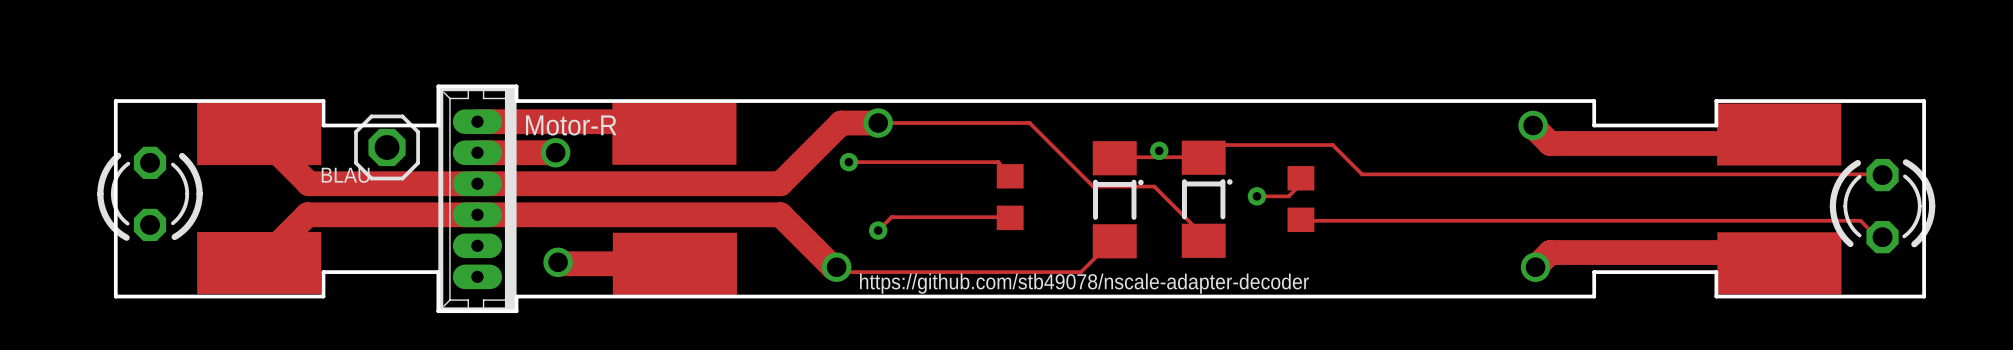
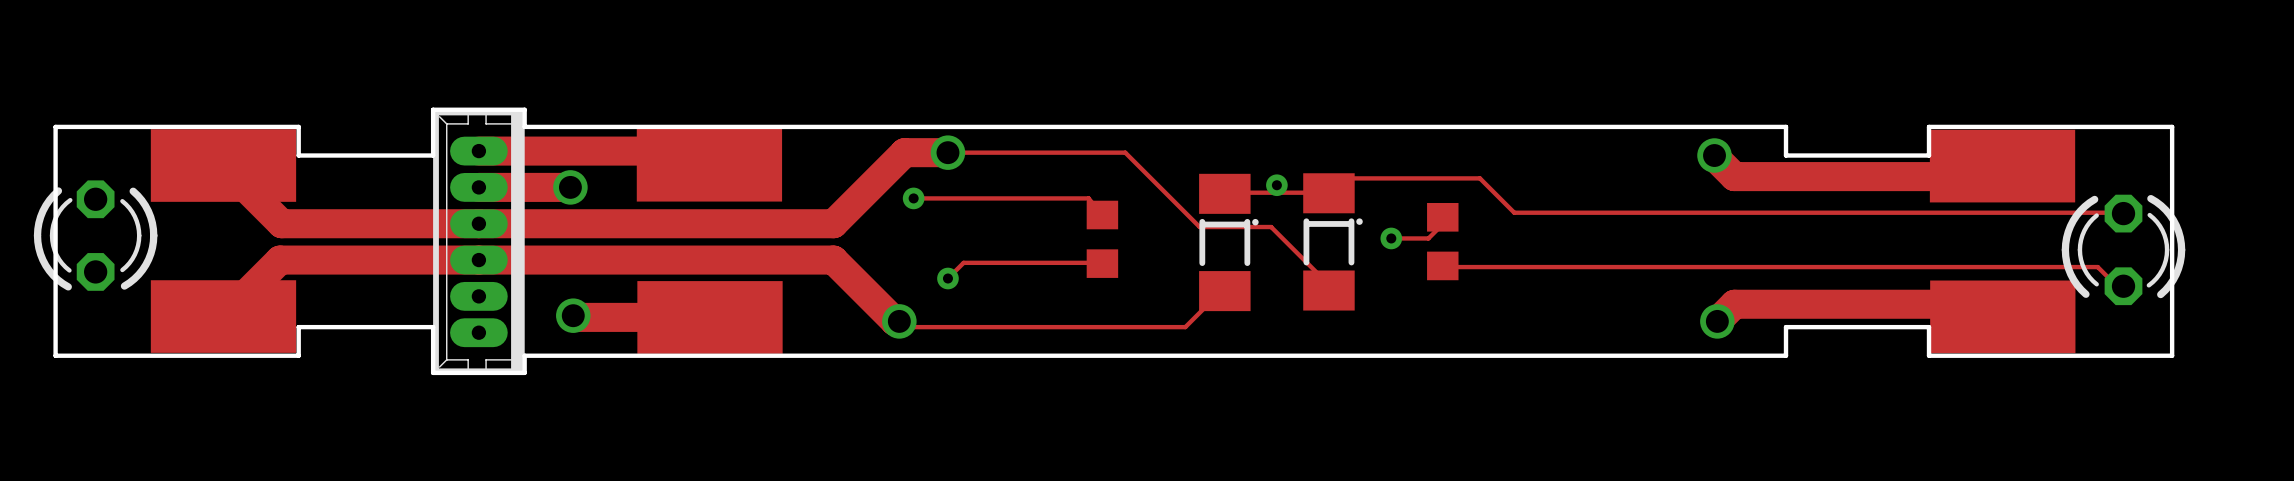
text: Motor-R (571, 125) -> none
BLAU: (387, 147) -> none
text: https://github.com/stb49078/nscale-adapter-decoder (1084, 283) -> none

